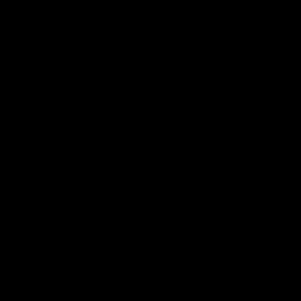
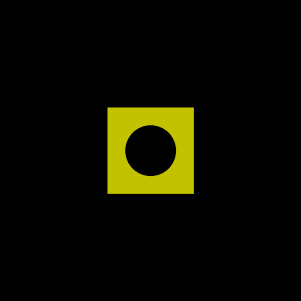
part: none -> (150, 150)

